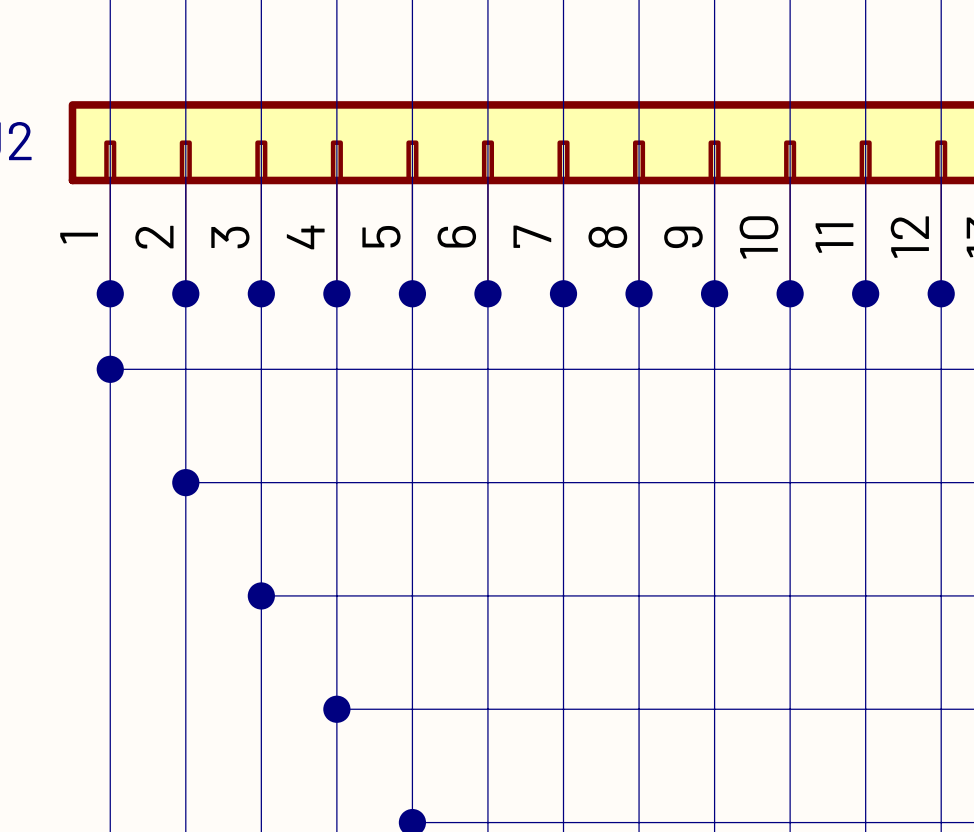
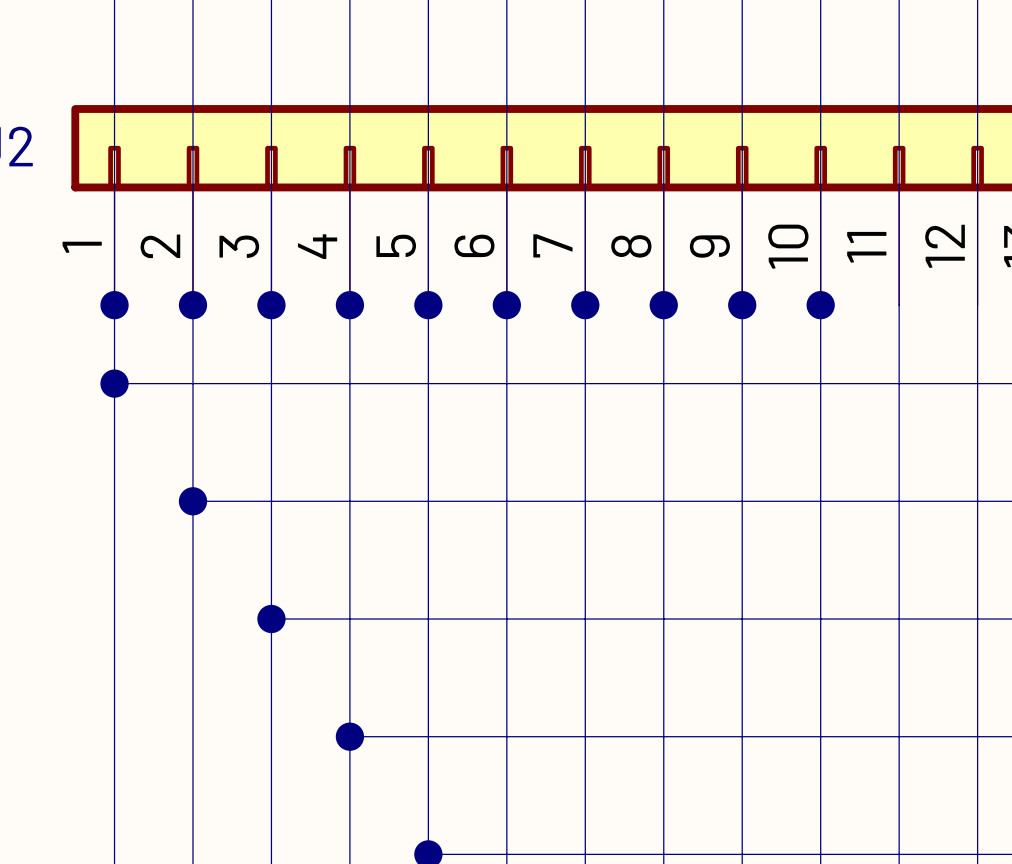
junction: (865, 293) -> none
junction: (941, 293) -> none

